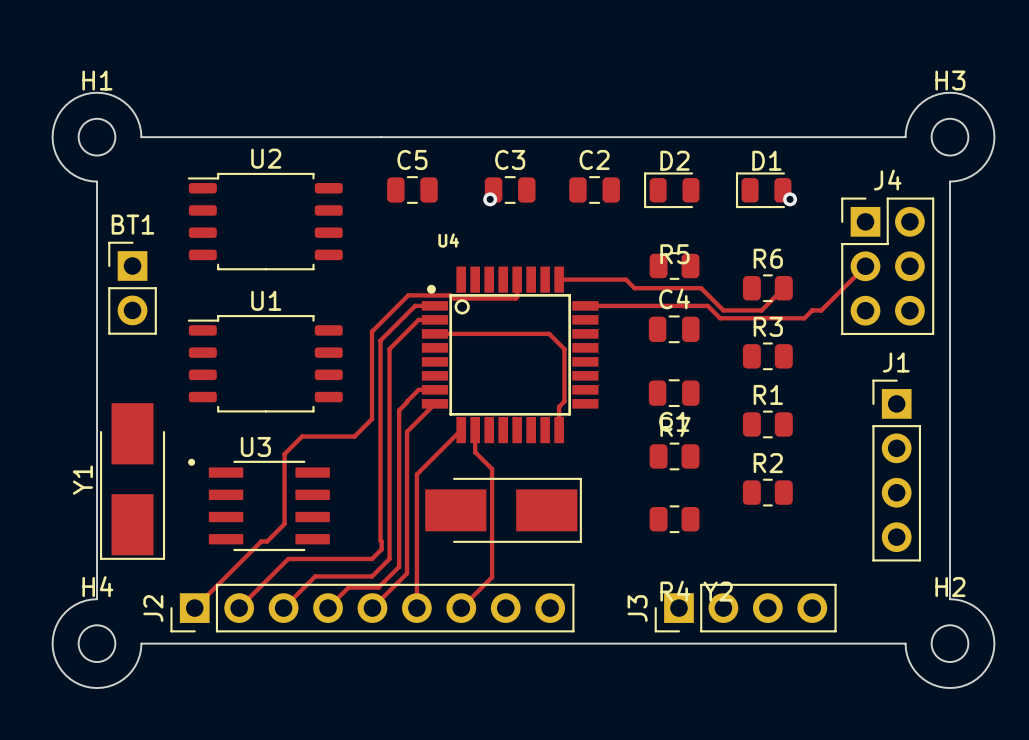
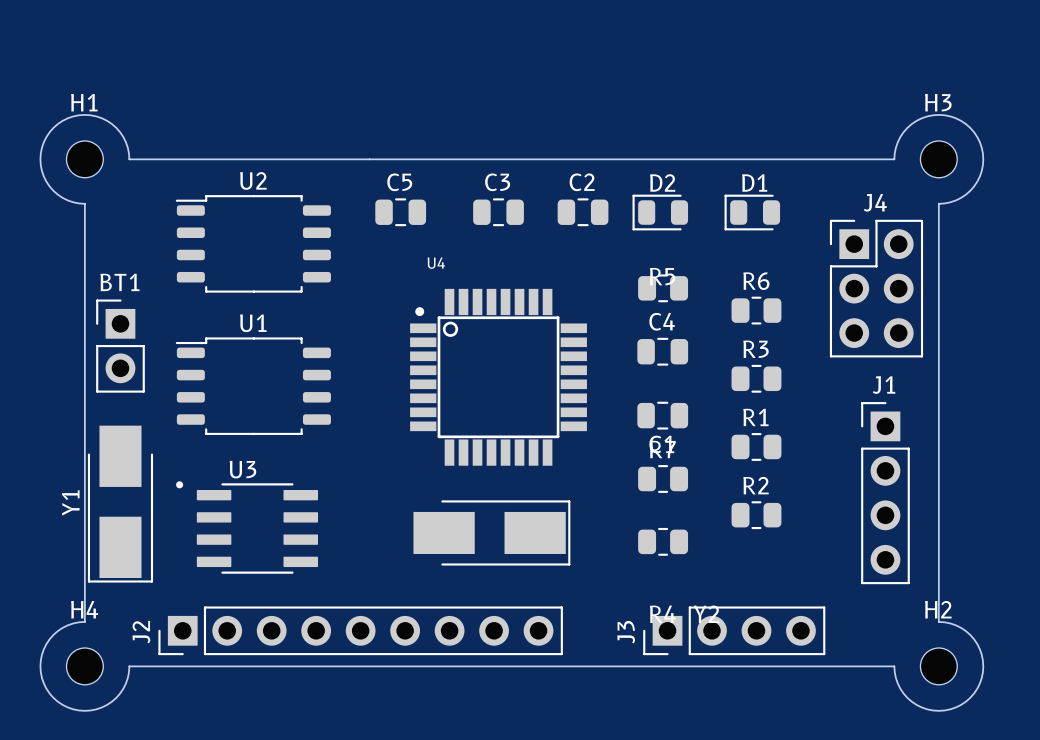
via: (490, 199) -> none
via: (790, 199) -> none
track: (865, 266) (821, 310) (812, 310) (804, 318) (720, 318) (707, 305) (585, 305) -> none
track: (517, 279) (515, 298) (453, 298) (450, 295) (408, 295) (372, 331) (372, 419) (354, 436) (302, 436) (284, 454) (284, 523) (267, 541) (261, 541) (194, 608) -> none
track: (559, 279) (626, 279) (634, 288) (701, 288) (723, 310) (761, 310) (783, 288) -> none
BT1 position: (132, 288) -> (120, 346)
track: (434, 305) (415, 305) (380, 340) (381, 549) (372, 558) (288, 558) (239, 608) -> none
track: (434, 319) (418, 319) (389, 349) (389, 558) (372, 576) (315, 576) (283, 608) -> none
track: (434, 333) (549, 333) (564, 349) (564, 401) (559, 406) (559, 430) -> none
track: (434, 389) (418, 389) (399, 410) (399, 566) (378, 587) (348, 587) (328, 608) -> none
track: (434, 403) (407, 431) (407, 573) (372, 608) -> none
track: (461, 430) (416, 474) (416, 608) -> none
track: (475, 430) (475, 452) (492, 469) (492, 577) (461, 608) -> none

